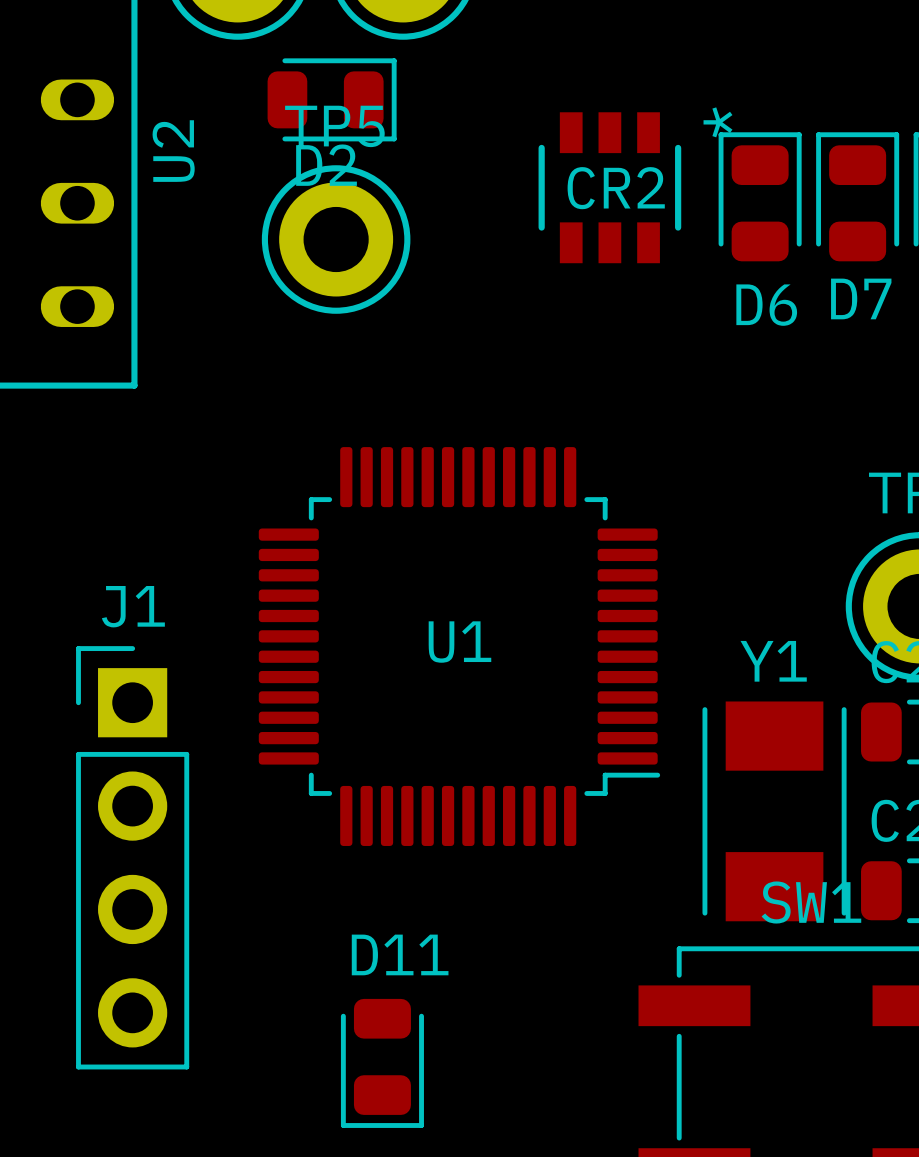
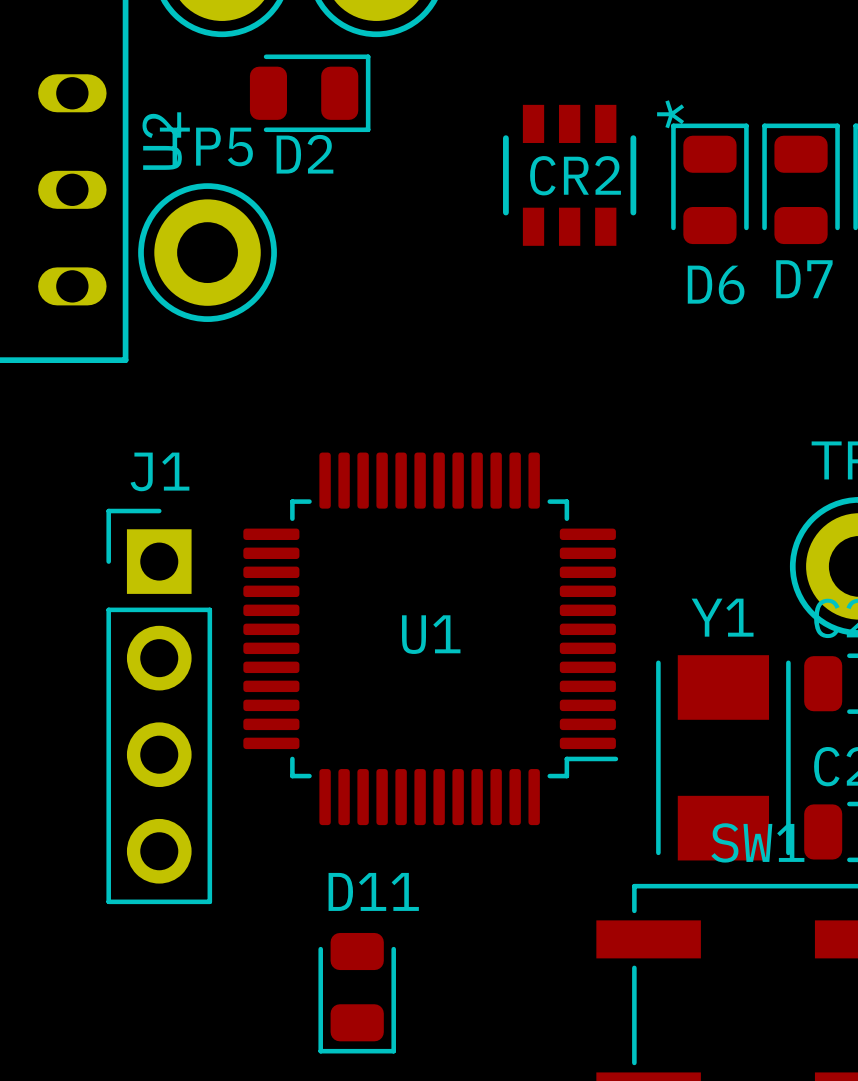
TP5 position: (336, 239) -> (207, 252)
U1 position: (459, 646) -> (430, 638)
J1 position: (132, 857) -> (159, 706)

